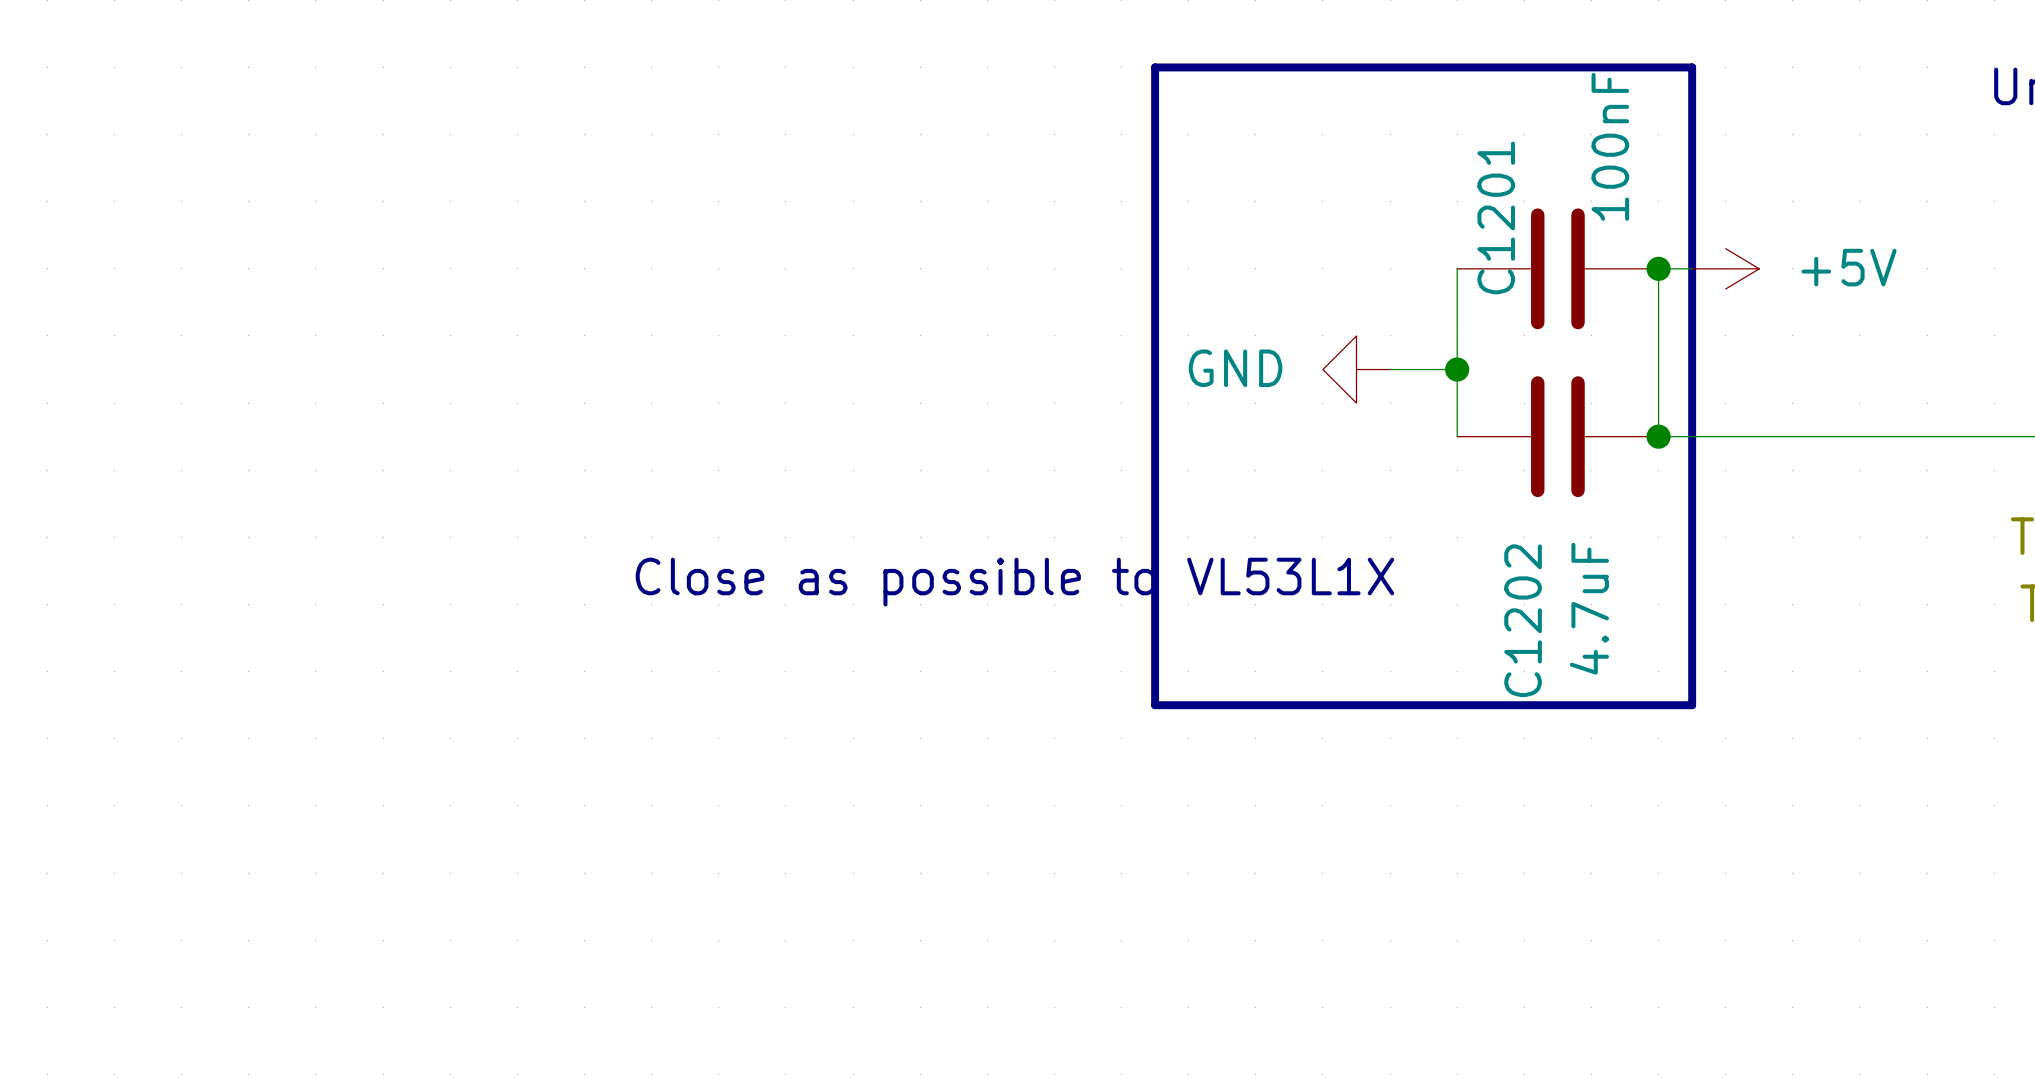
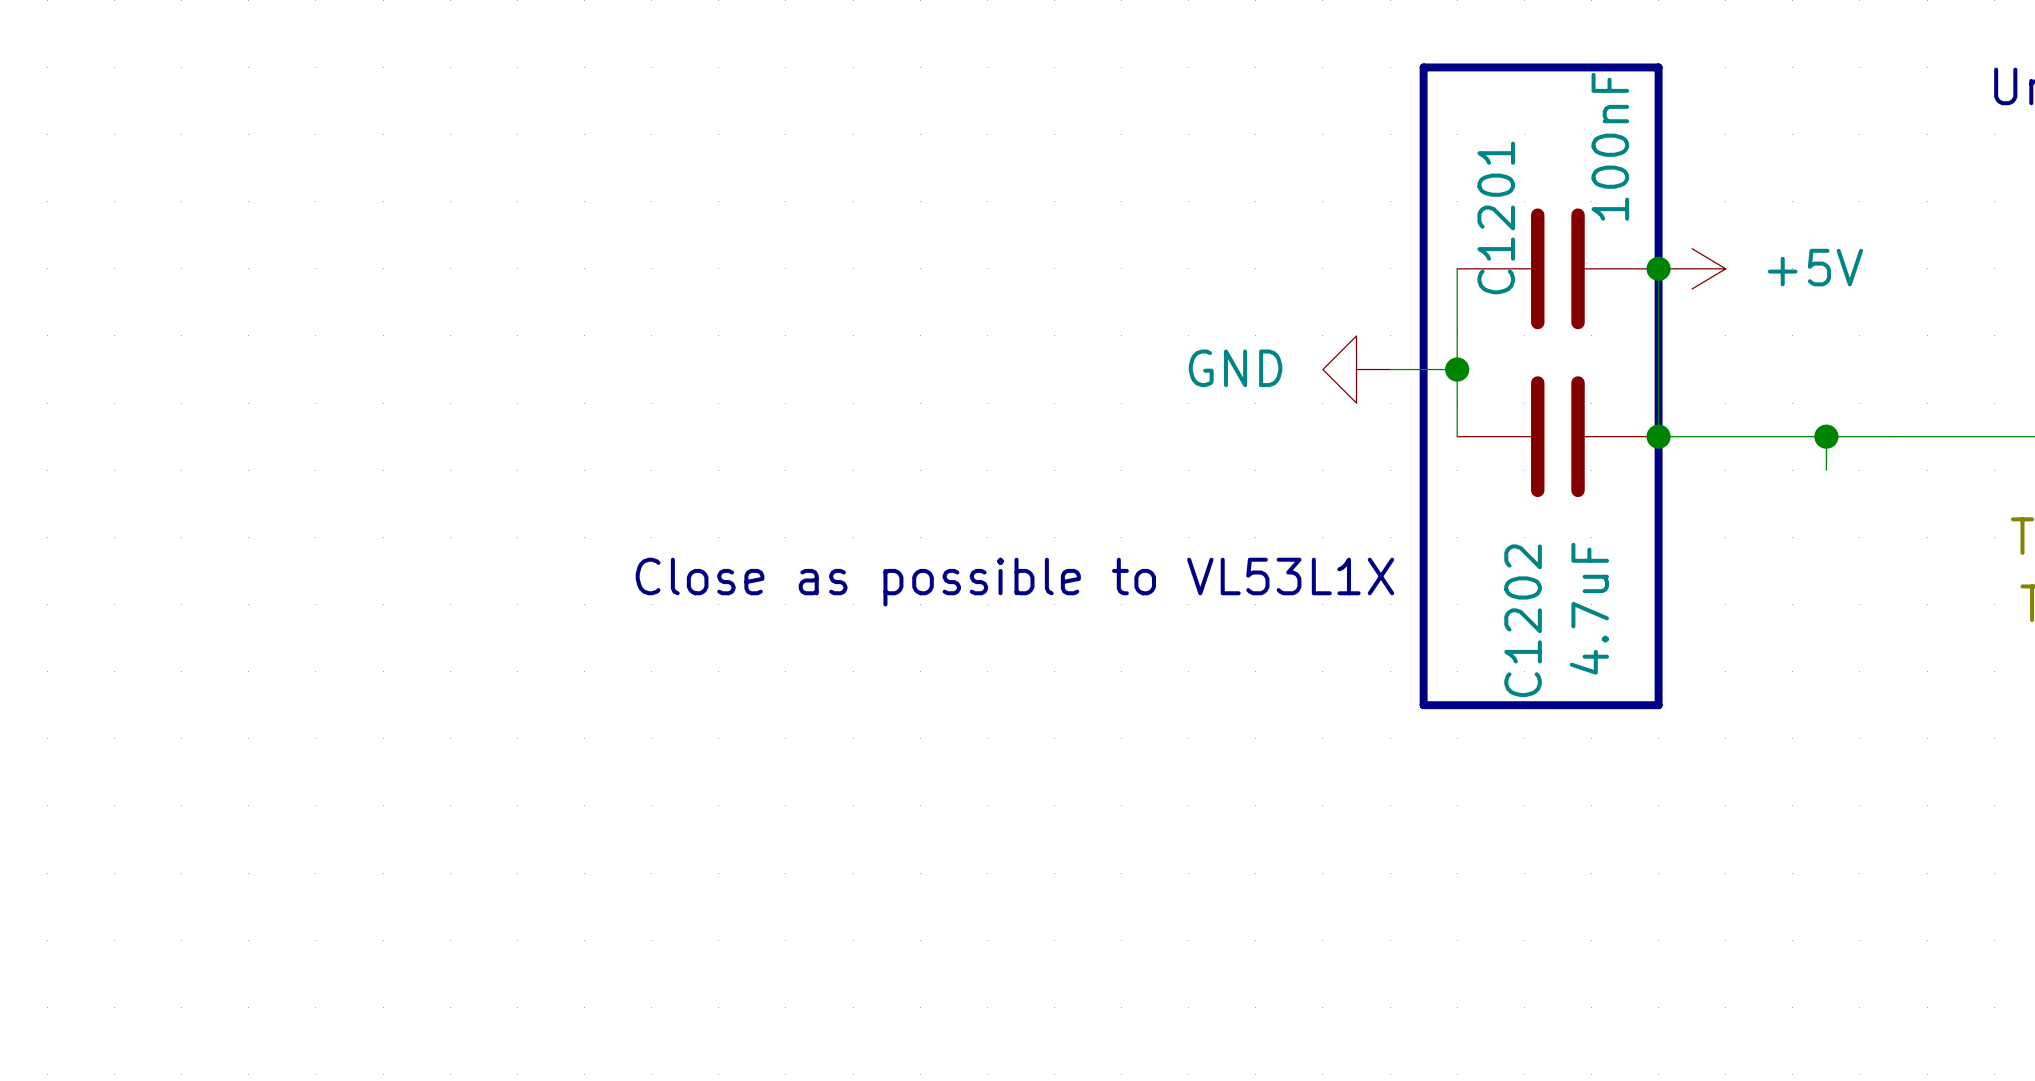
line: (1423, 67) (1155, 67) (1155, 705) (1423, 705) -> (1423, 67) (1423, 705)
line: (1658, 67) (1692, 67) (1692, 705) (1658, 705) -> (1658, 67) (1658, 705)
power symbol position: +5V (1725, 268) -> +5V (1692, 268)
wire: none -> (1826, 436) (1826, 470)
junction: none -> (1826, 436)

